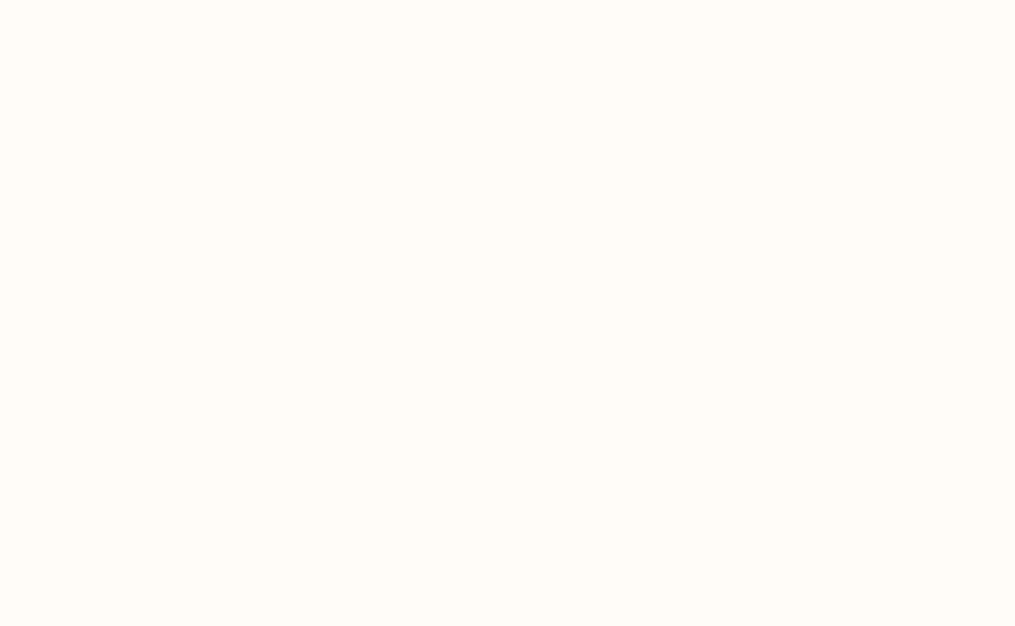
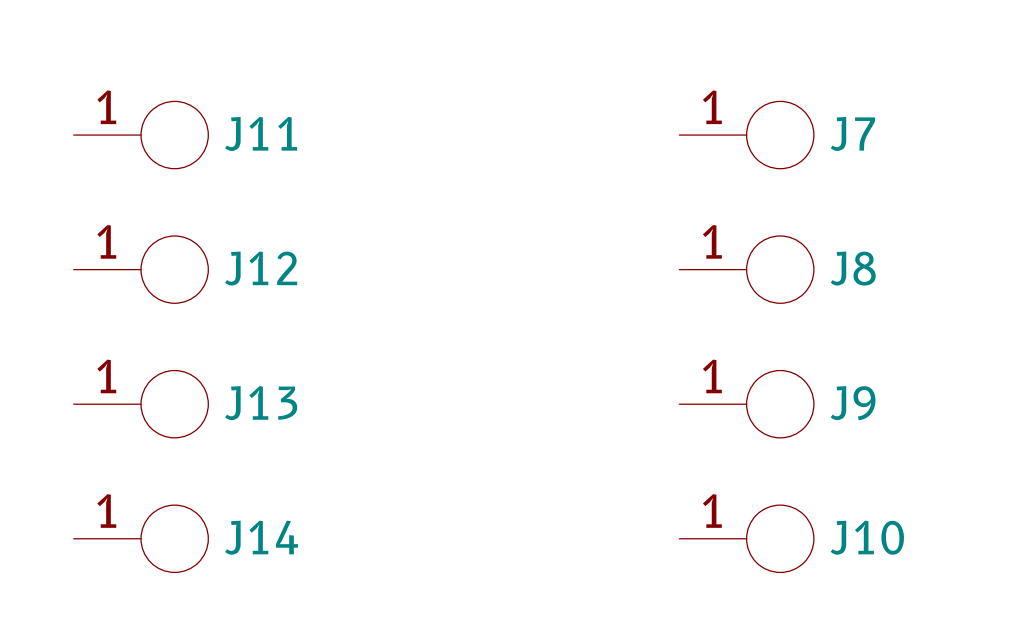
J11: none -> (141, 135)
J7: none -> (746, 135)
J12: none -> (141, 269)
J8: none -> (746, 269)
J13: none -> (141, 404)
J9: none -> (746, 404)
J14: none -> (141, 538)
J10: none -> (746, 538)

